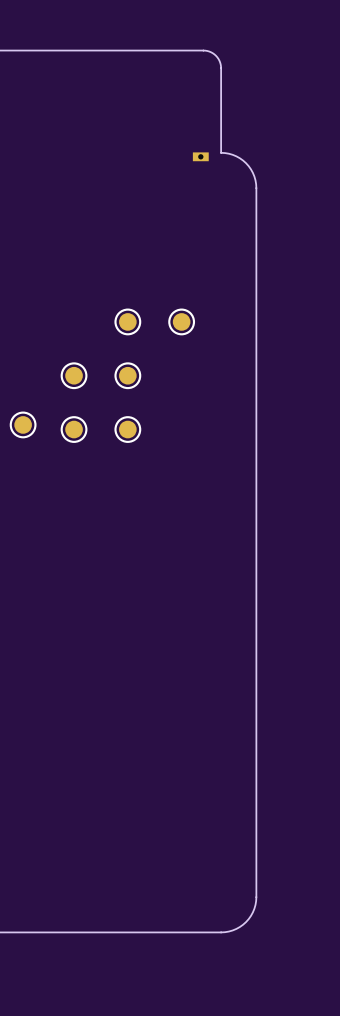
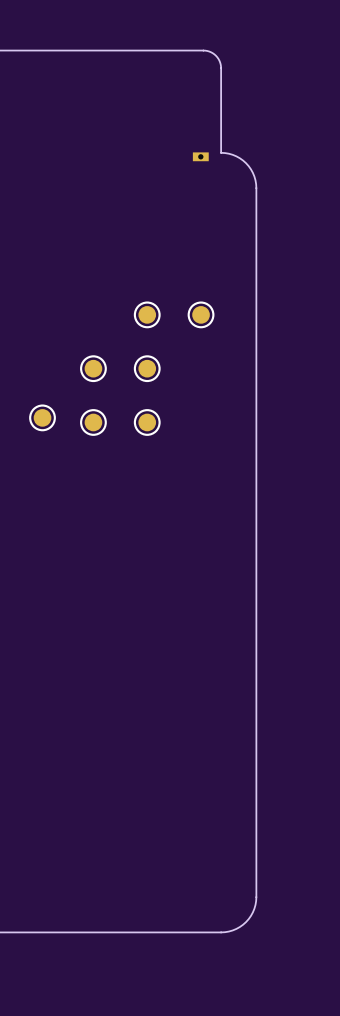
part: none -> (147, 314)
part: none -> (201, 314)
part: (127, 321) -> none
part: (181, 321) -> none
part: none -> (93, 368)
part: none -> (147, 368)
part: (74, 375) -> none
part: (127, 375) -> none
part: none -> (42, 417)
part: none -> (93, 422)
part: none -> (147, 422)
part: (23, 424) -> none
part: (74, 429) -> none
part: (127, 429) -> none

